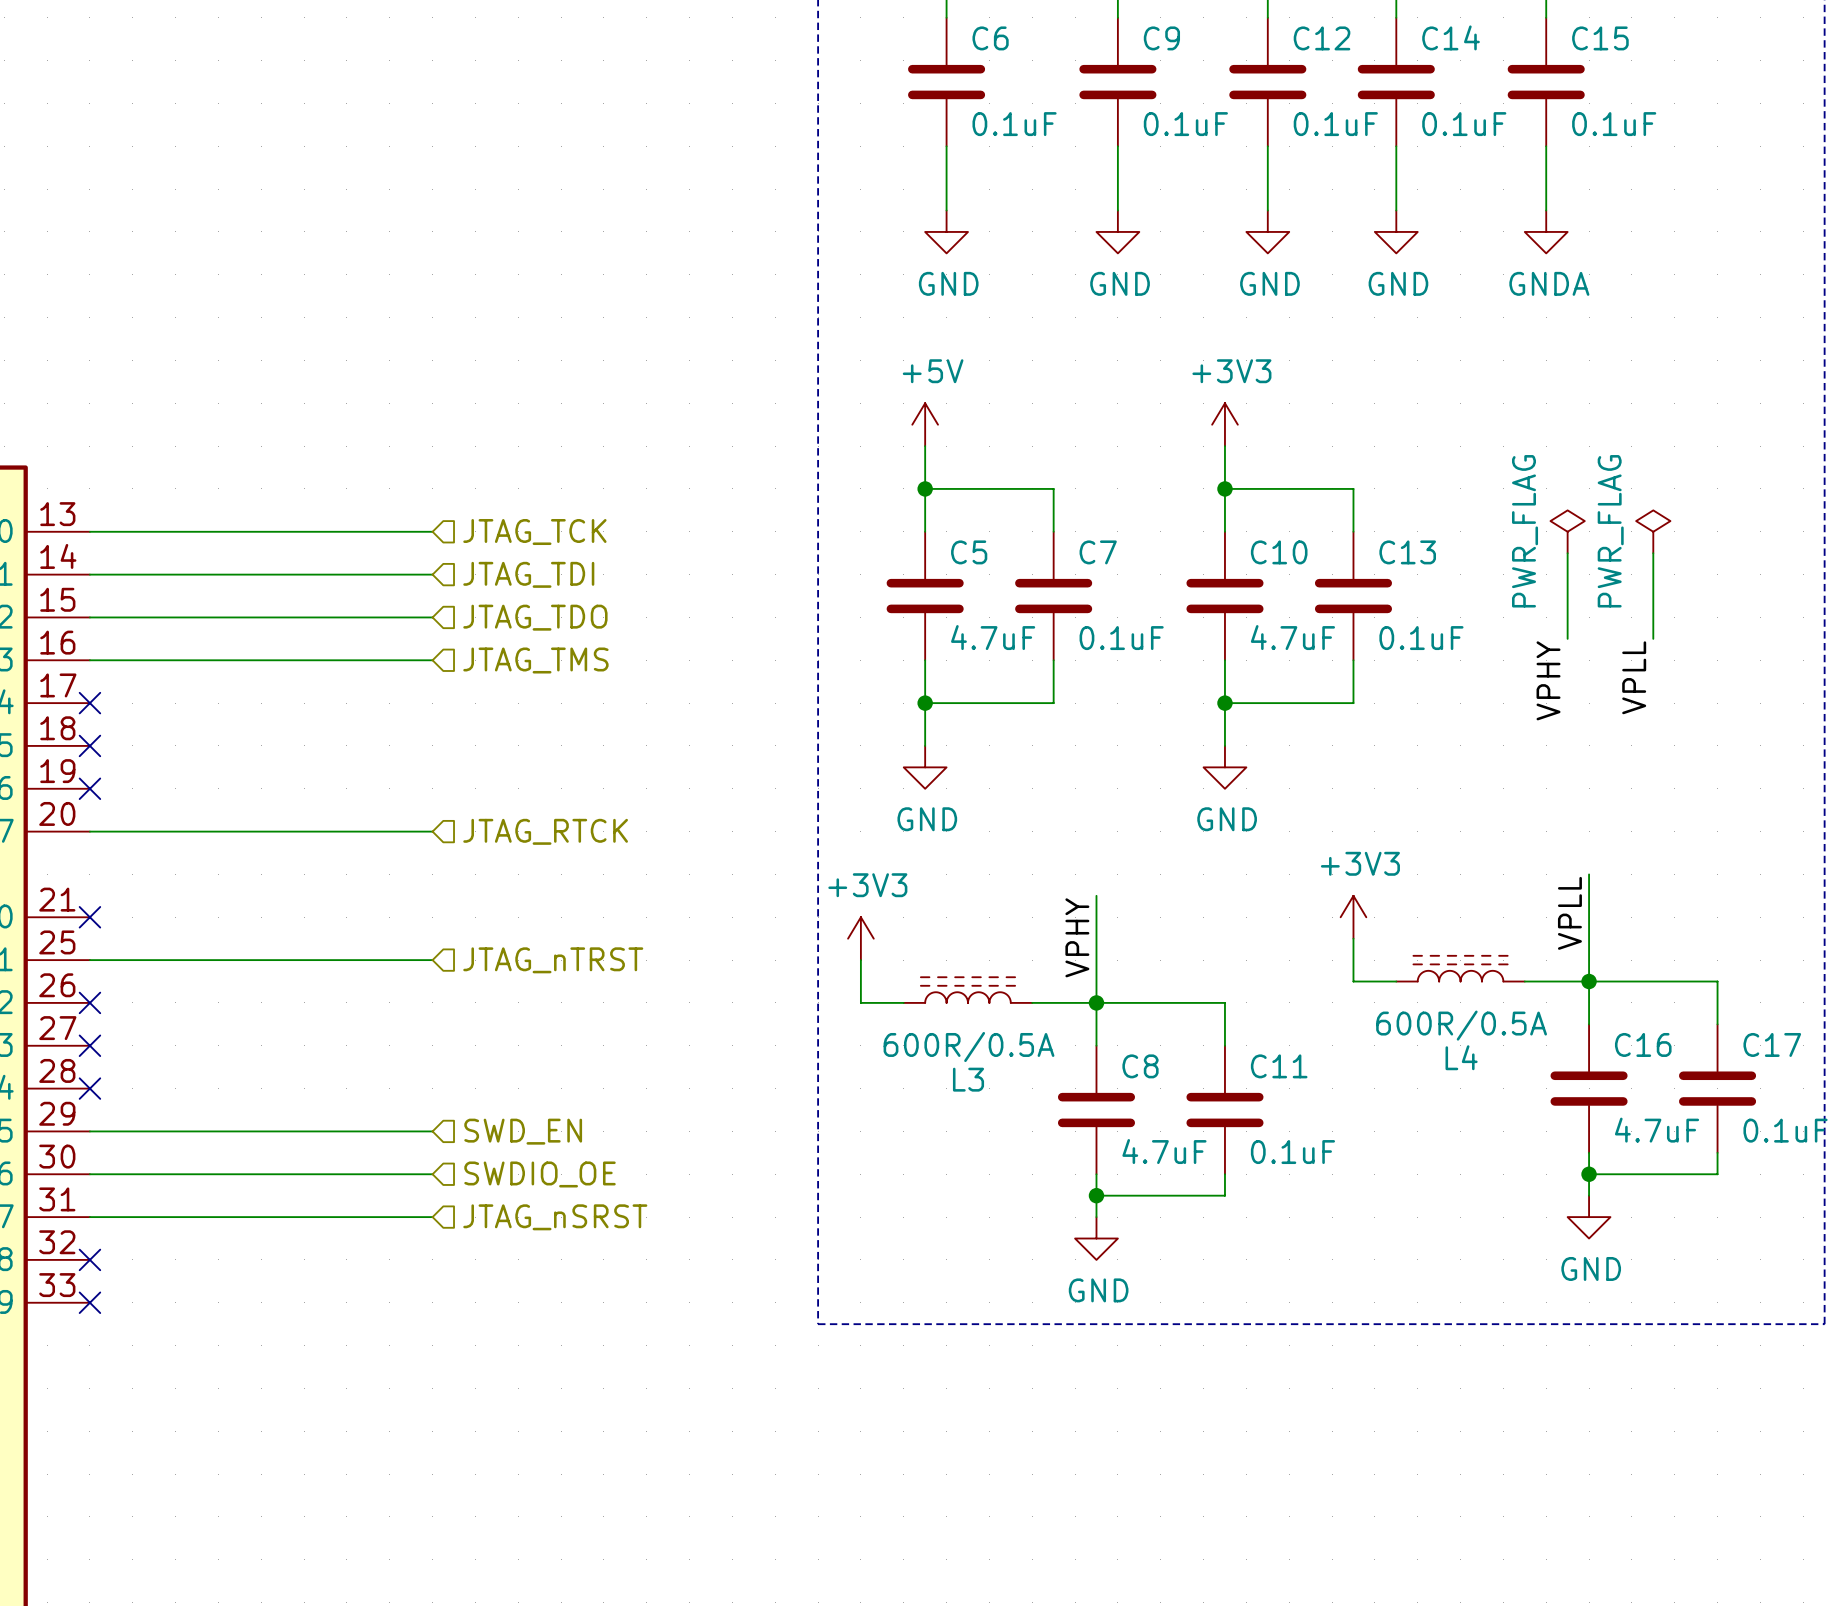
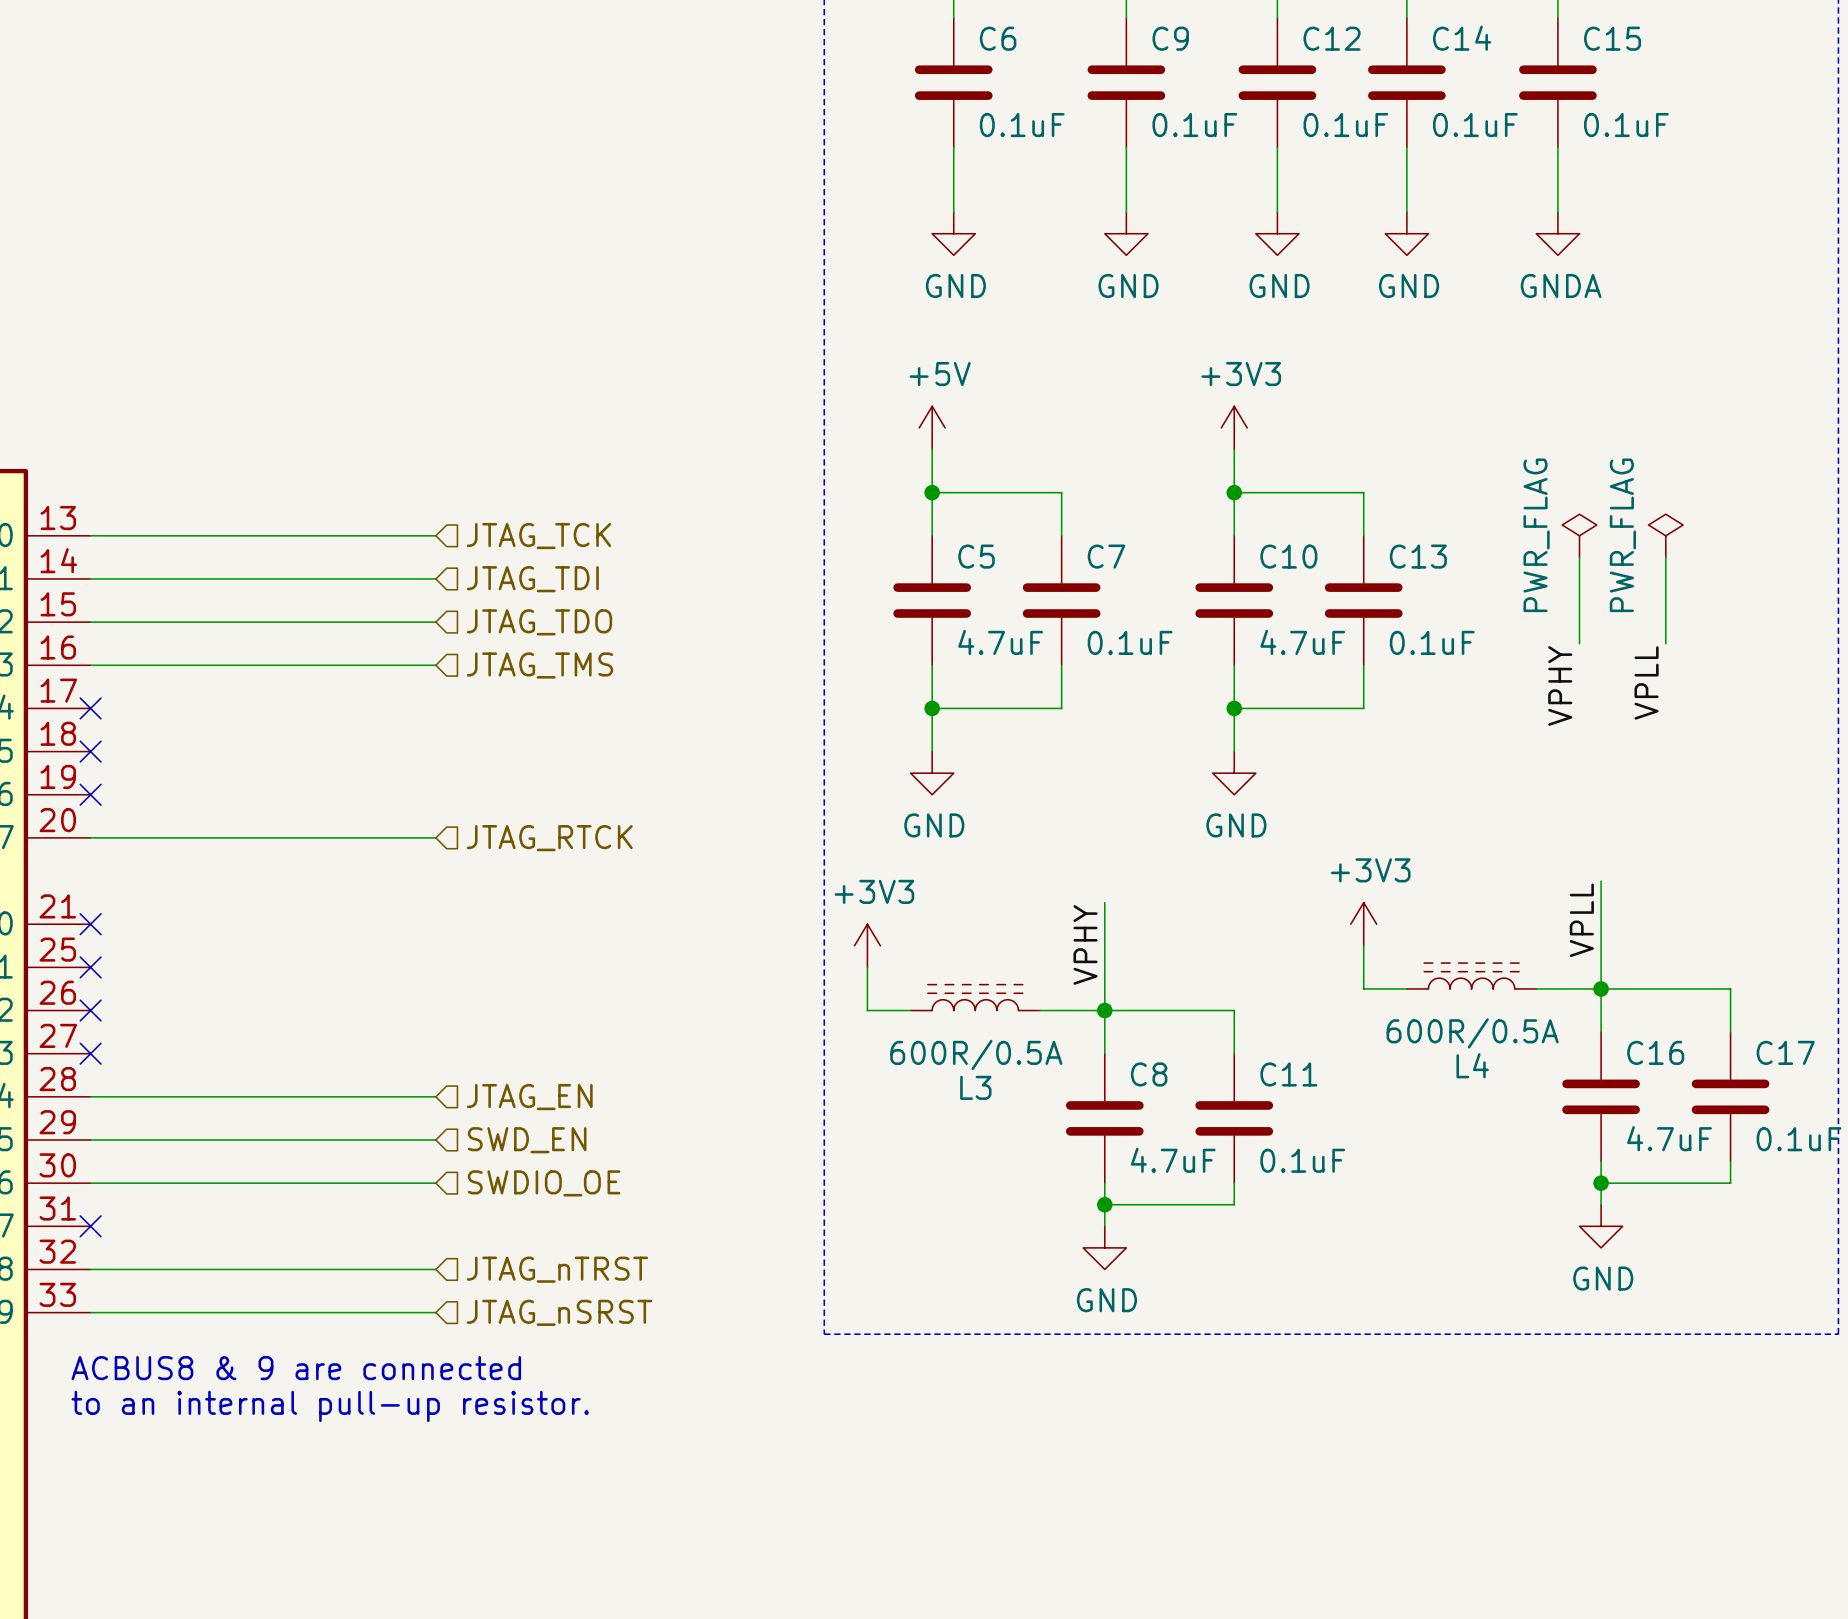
wire: (89, 960) (432, 960) -> (90, 1096) (435, 1096)
no-connect mark: none -> (90, 967)
hierarchical label position: JTAG_nTRST (553, 960) -> JTAG_nTRST (557, 1269)
no-connect mark: (89, 1088) -> none
hierarchical label: none -> JTAG_EN (529, 1097)
wire: (89, 1217) (432, 1217) -> (90, 1269) (435, 1269)
no-connect mark: none -> (90, 1226)
hierarchical label position: JTAG_nSRST (555, 1217) -> JTAG_nSRST (559, 1312)
no-connect mark: (89, 1259) -> none
wire: none -> (90, 1312) (435, 1312)
no-connect mark: (89, 1302) -> none
text: none -> ACBUS8 & 9 are connected (296, 1368)
text: none -> to an internal pull-up resistor. (330, 1406)

